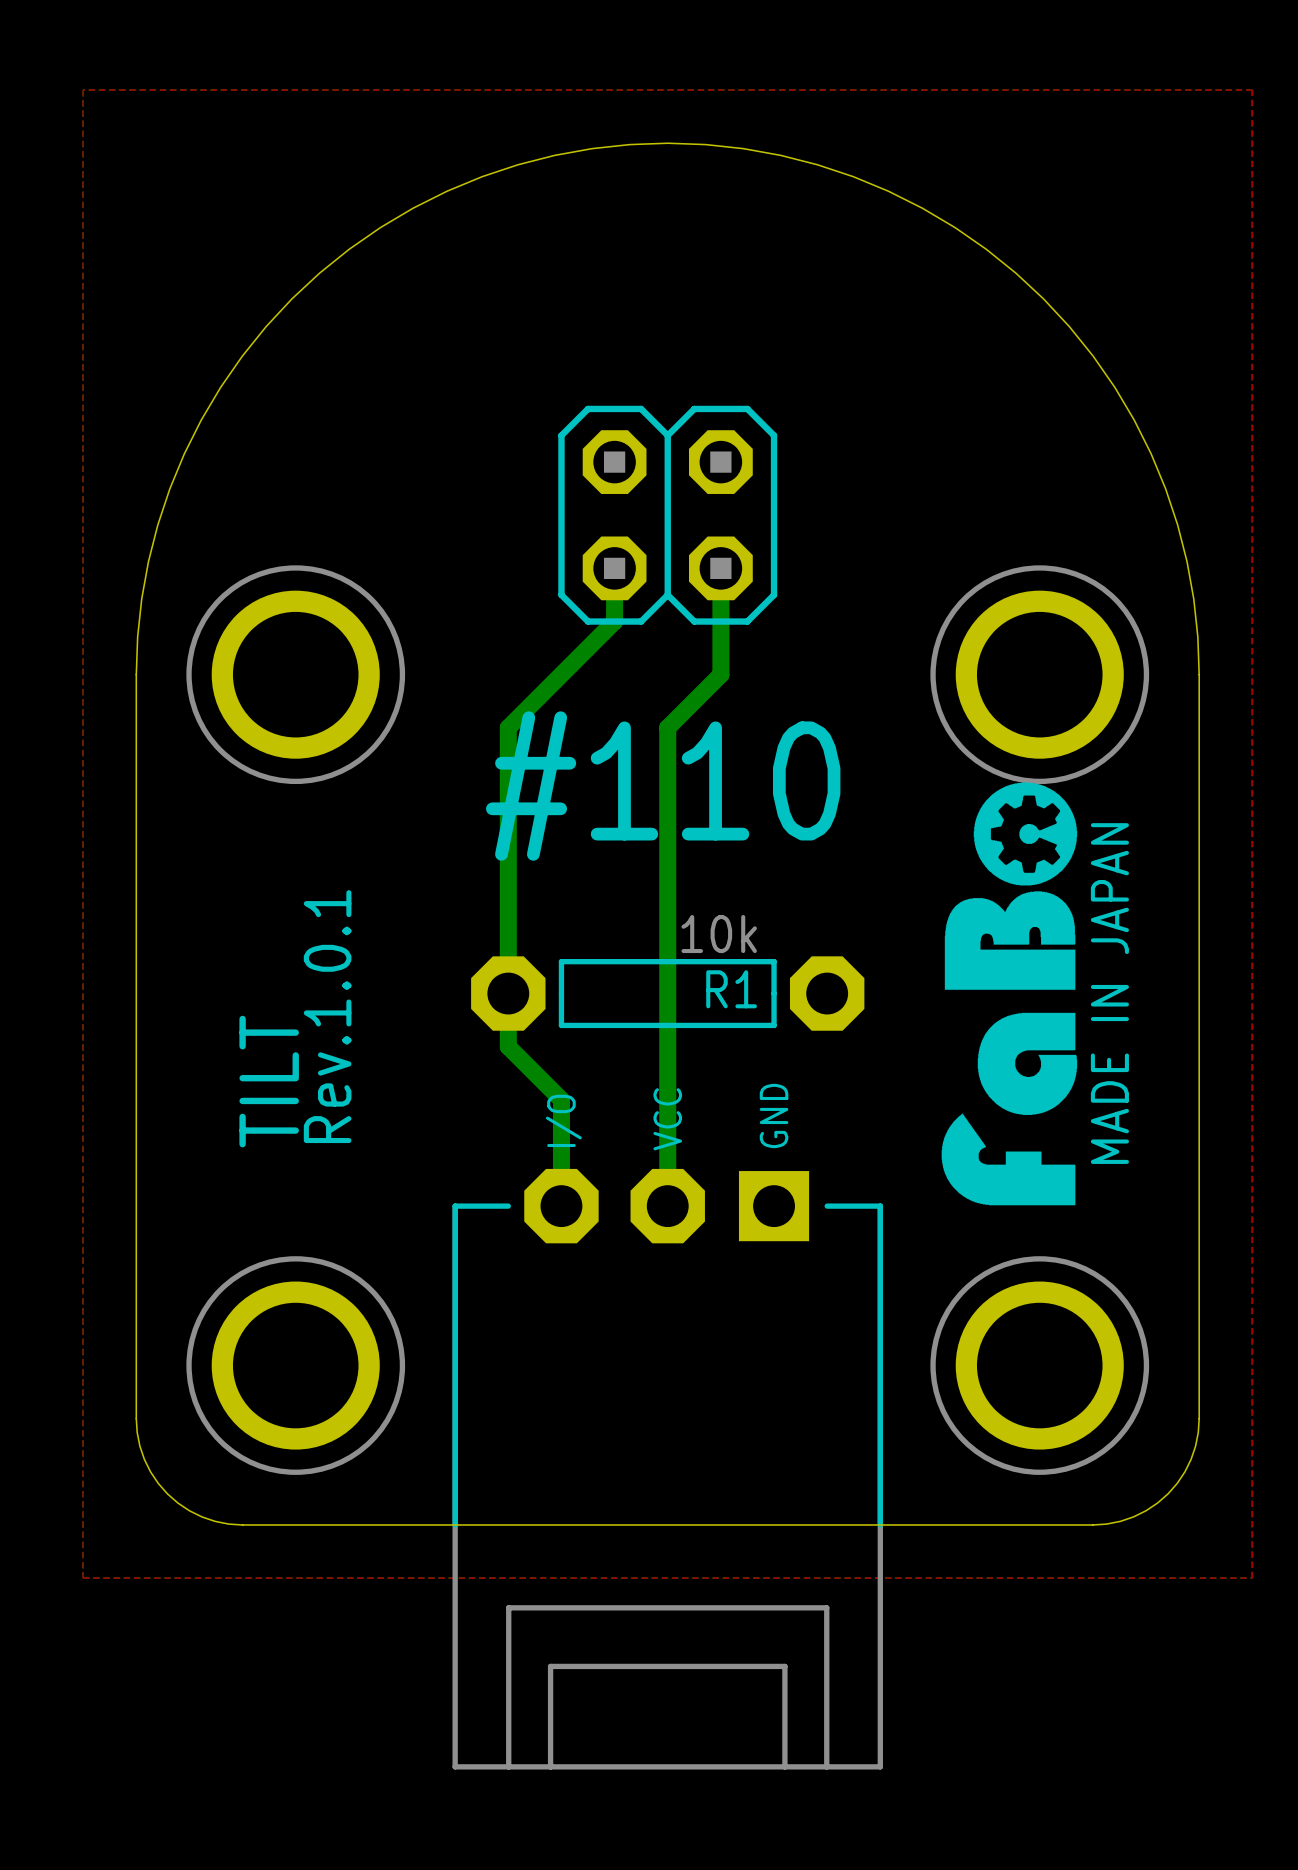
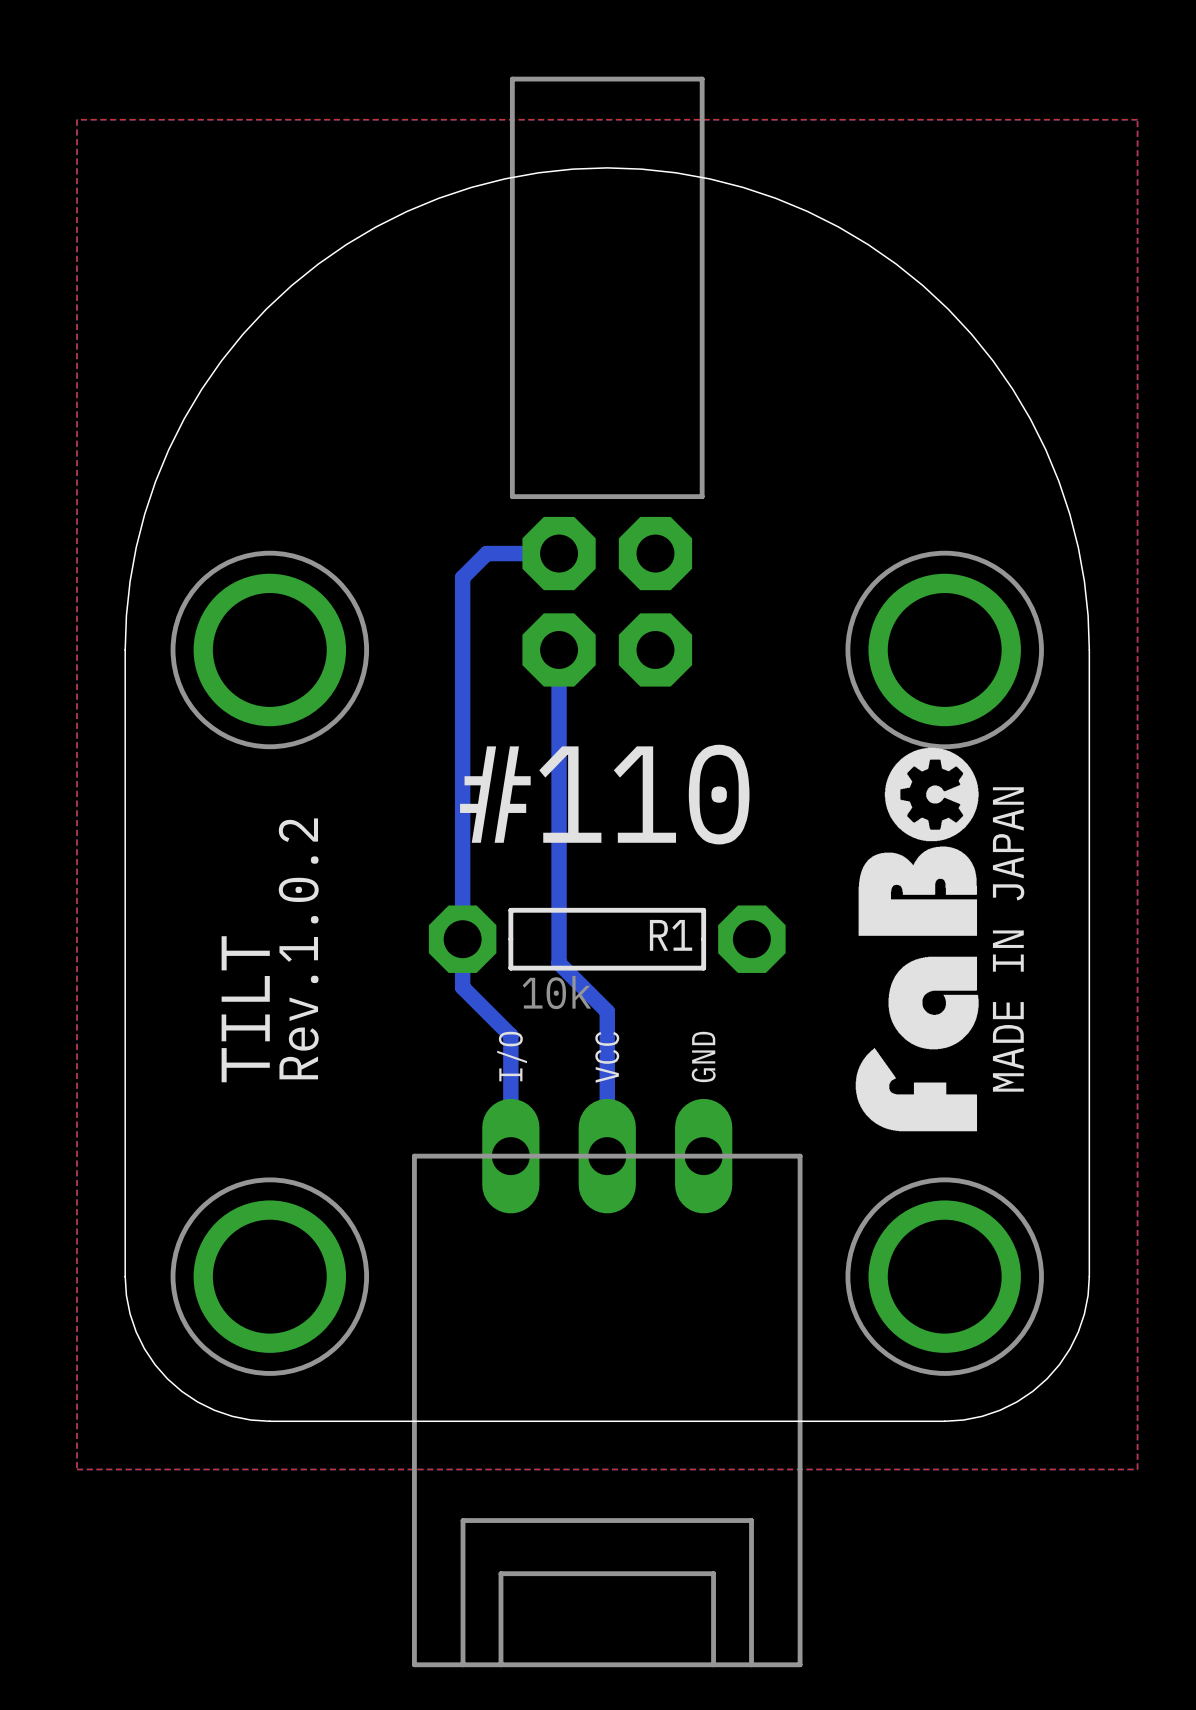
part footprint: [136, 143, 1200, 1770] -> [125, 167, 1090, 1668]
part: none -> (607, 381)
part: (667, 515) -> none
bottom track: (614, 568) (614, 621) (508, 727) -> (559, 553) (486, 553) (462, 577) (462, 698)
bottom track: (720, 568) (720, 674) (667, 727) (667, 1073) -> (559, 649) (559, 963) (607, 1011)
text position: #110 (663, 786) -> #110 (604, 794)
R1 value position: 10k (719, 934) -> 10k (556, 992)
text: Rev.1.0.1 (327, 1016) -> Rev.1.0.2 (298, 948)

